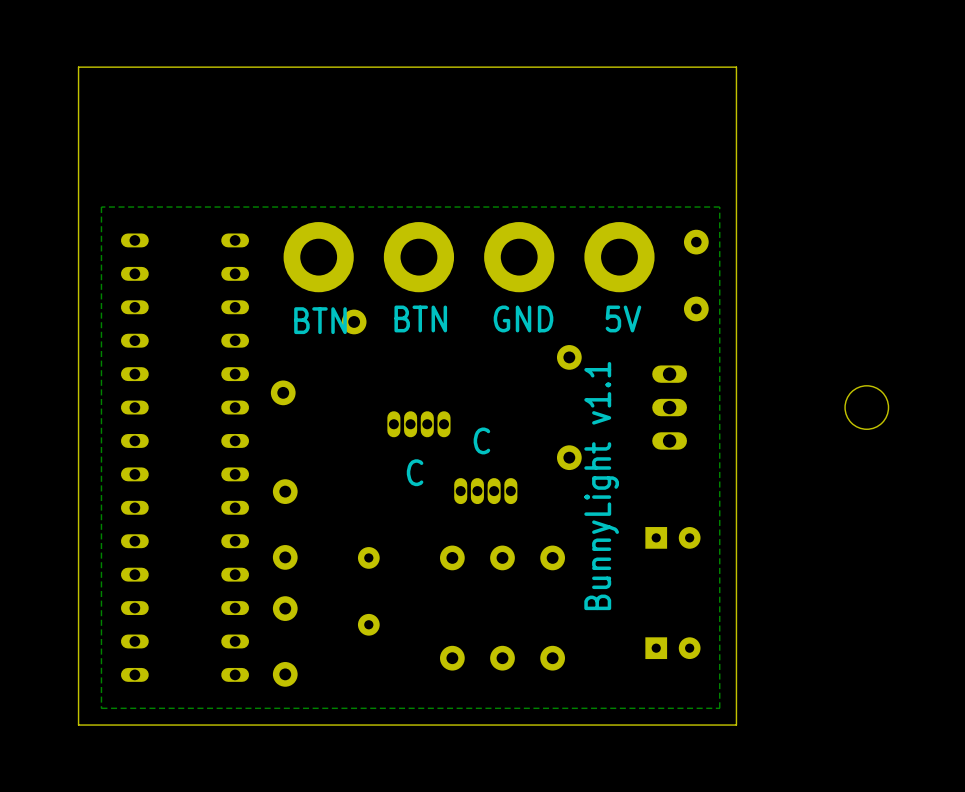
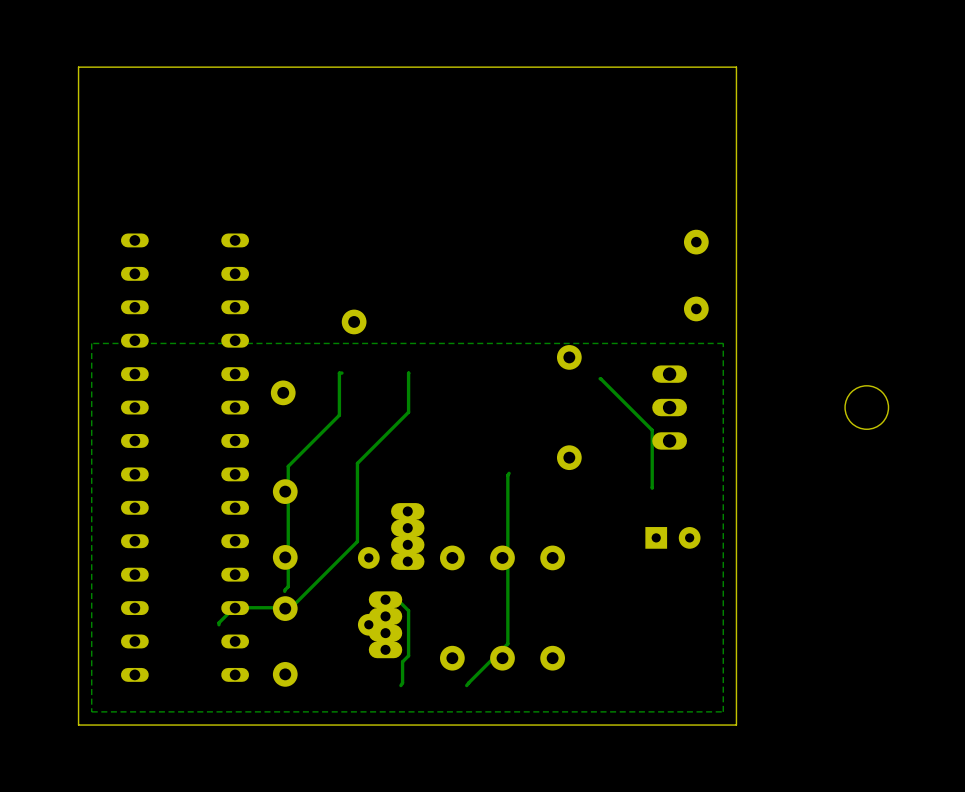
zone outline: (719, 207) (101, 207) (101, 708) (719, 708) (719, 207) -> (723, 343) (723, 711) (91, 711) (91, 343) (723, 343)
part: (318, 257) -> none
part: (418, 257) -> none
part: (519, 257) -> none
part: (619, 257) -> none
text: BTN (420, 318) -> none
text: GND (523, 318) -> none
text: 5V (623, 318) -> none
text: BTN (320, 320) -> none
track: none -> (341, 373) (339, 373) (339, 415) (288, 466) (288, 586) (284, 591)
track: none -> (408, 373) (408, 412) (357, 463) (357, 541) (291, 607) (234, 607) (218, 624)
track: none -> (600, 378) (652, 430) (652, 488)
part: (418, 424) -> none
text: C (481, 440) -> none
text: C (415, 472) -> none
track: none -> (509, 473) (507, 643) (466, 685)
text: BunnyLight v1.1 (601, 486) -> none
part: (485, 491) -> none
part: none -> (407, 536)
track: none -> (385, 599) (387, 601) (399, 601) (408, 610) (408, 655) (402, 661) (400, 685)
part: none -> (385, 624)
part: (672, 648) -> none

